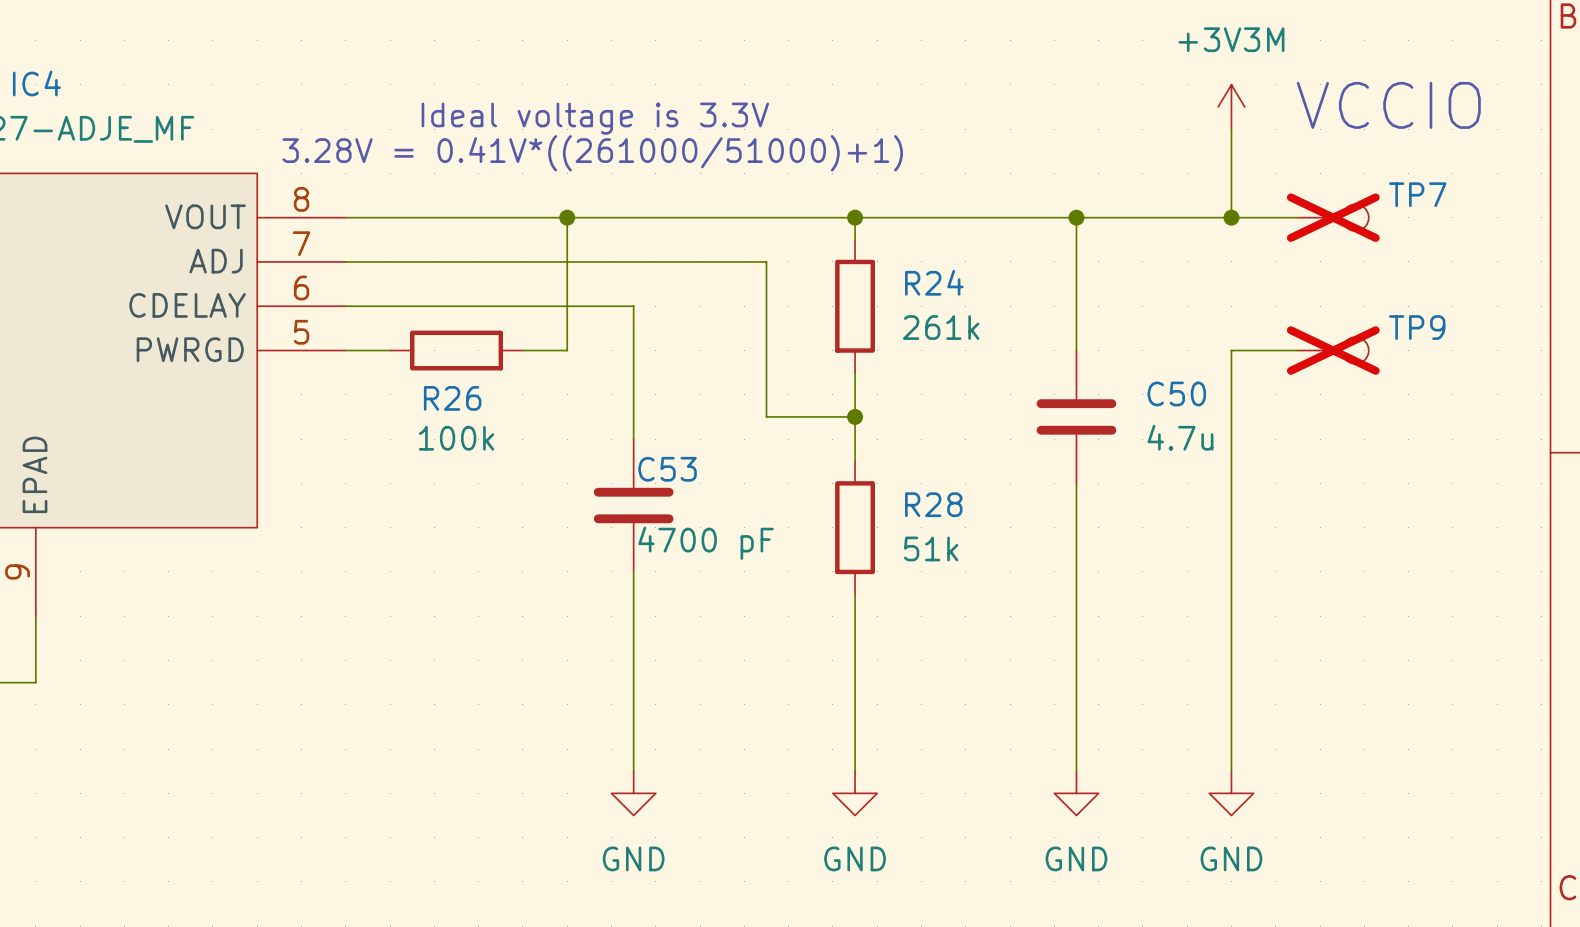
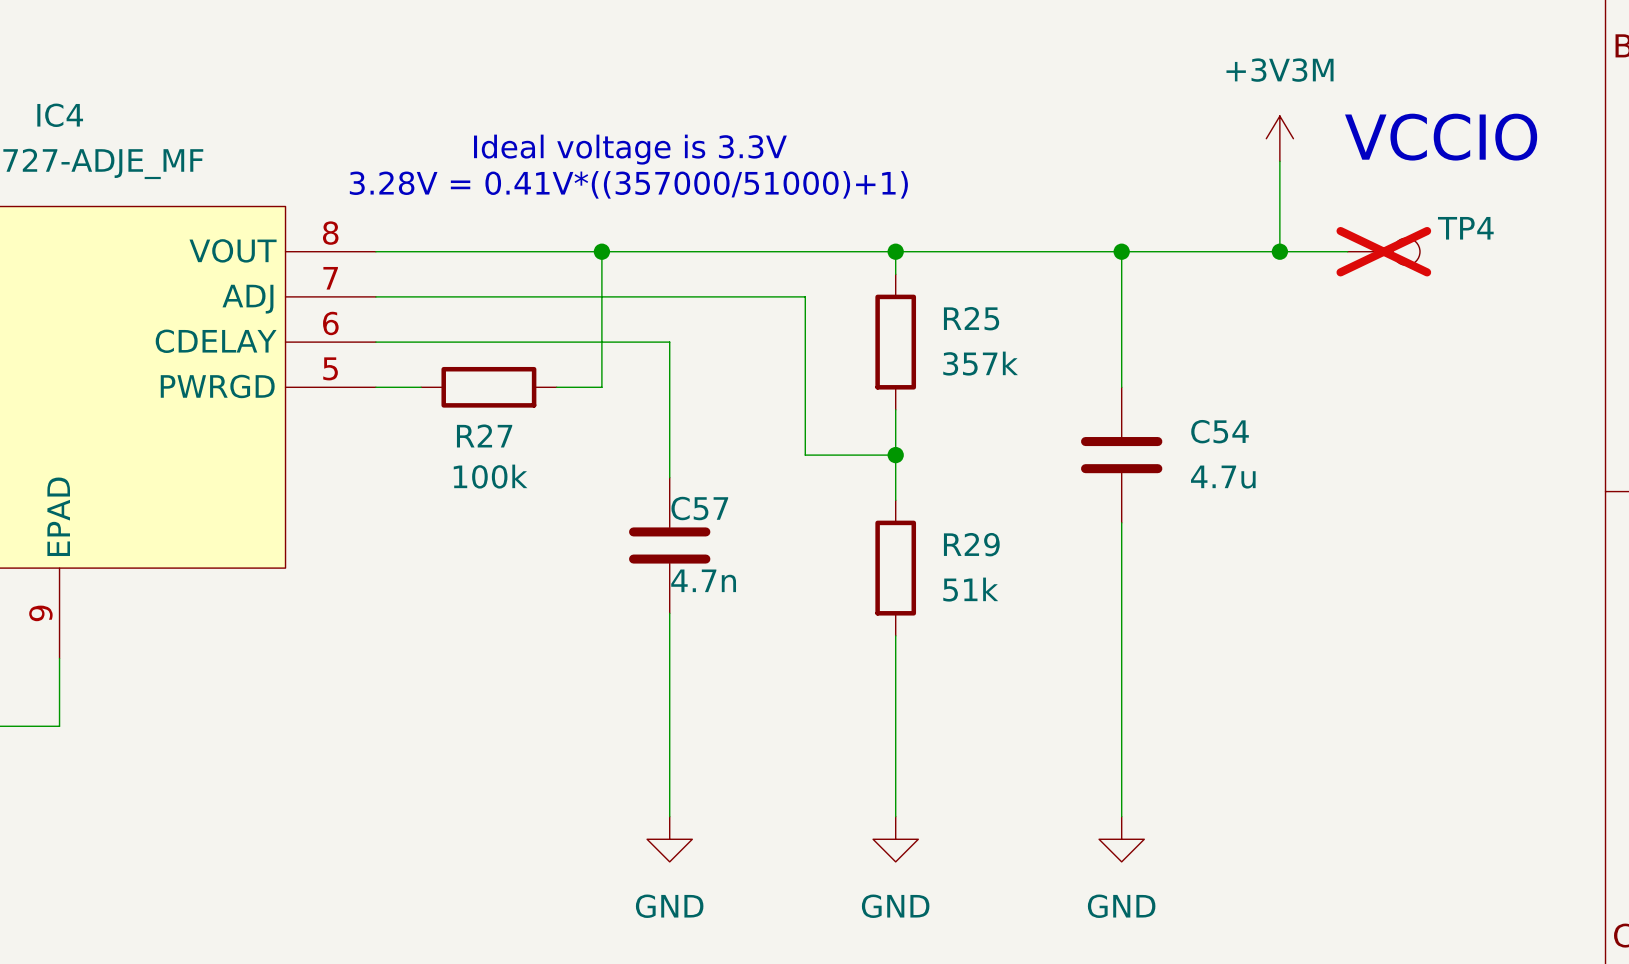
text: 3.28V = 0.41V*((261000/51000)+1) (592, 153) -> 3.28V = 0.41V*((357000/51000)+1) (628, 184)
TP7 name: TP7 (1417, 194) -> TP4 (1465, 228)
R24 name: R24 (934, 282) -> R25 (971, 318)
R24 value: 261k (941, 327) -> 357k (980, 363)
wire: (1297, 350) (1231, 350) (1231, 771) -> none
TP9: (1333, 350) -> none
C50 name: C50 (1176, 393) -> C54 (1220, 431)
R26 name: R26 (452, 398) -> R27 (484, 435)
C53 name: C53 (667, 469) -> C57 (699, 508)
R28 name: R28 (933, 504) -> R29 (971, 544)
C53 value: 4700 pF (706, 543) -> 4.7n (703, 580)
power symbol: GND (1231, 793) -> none

